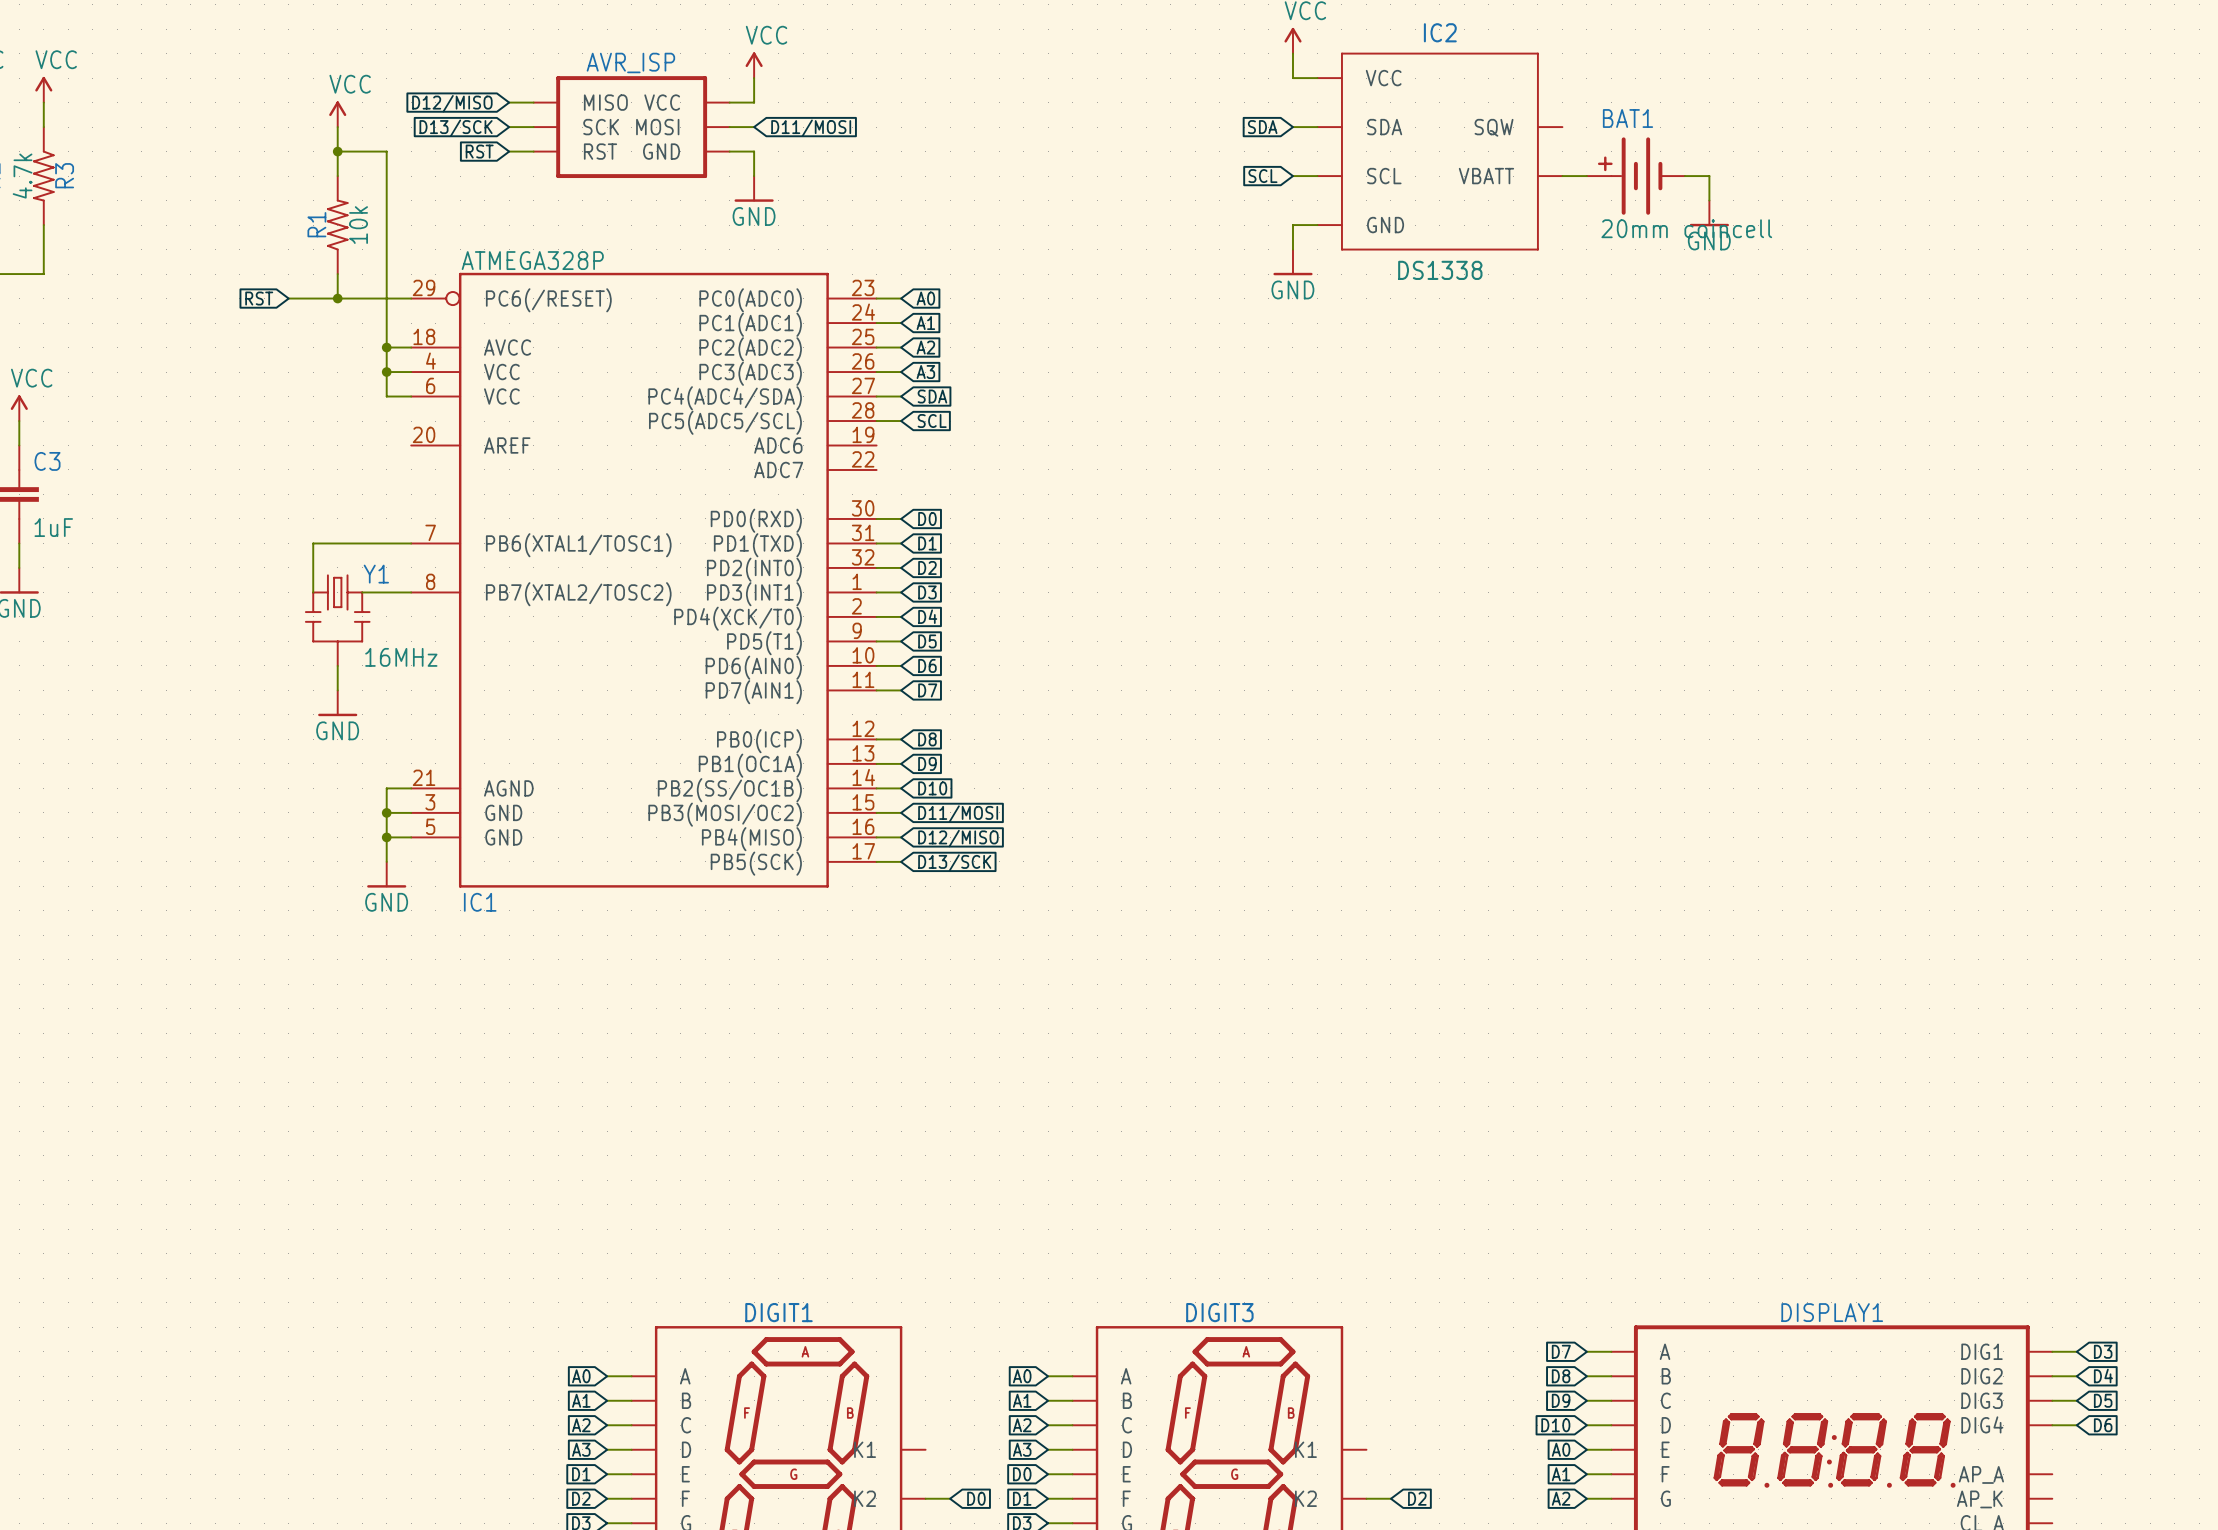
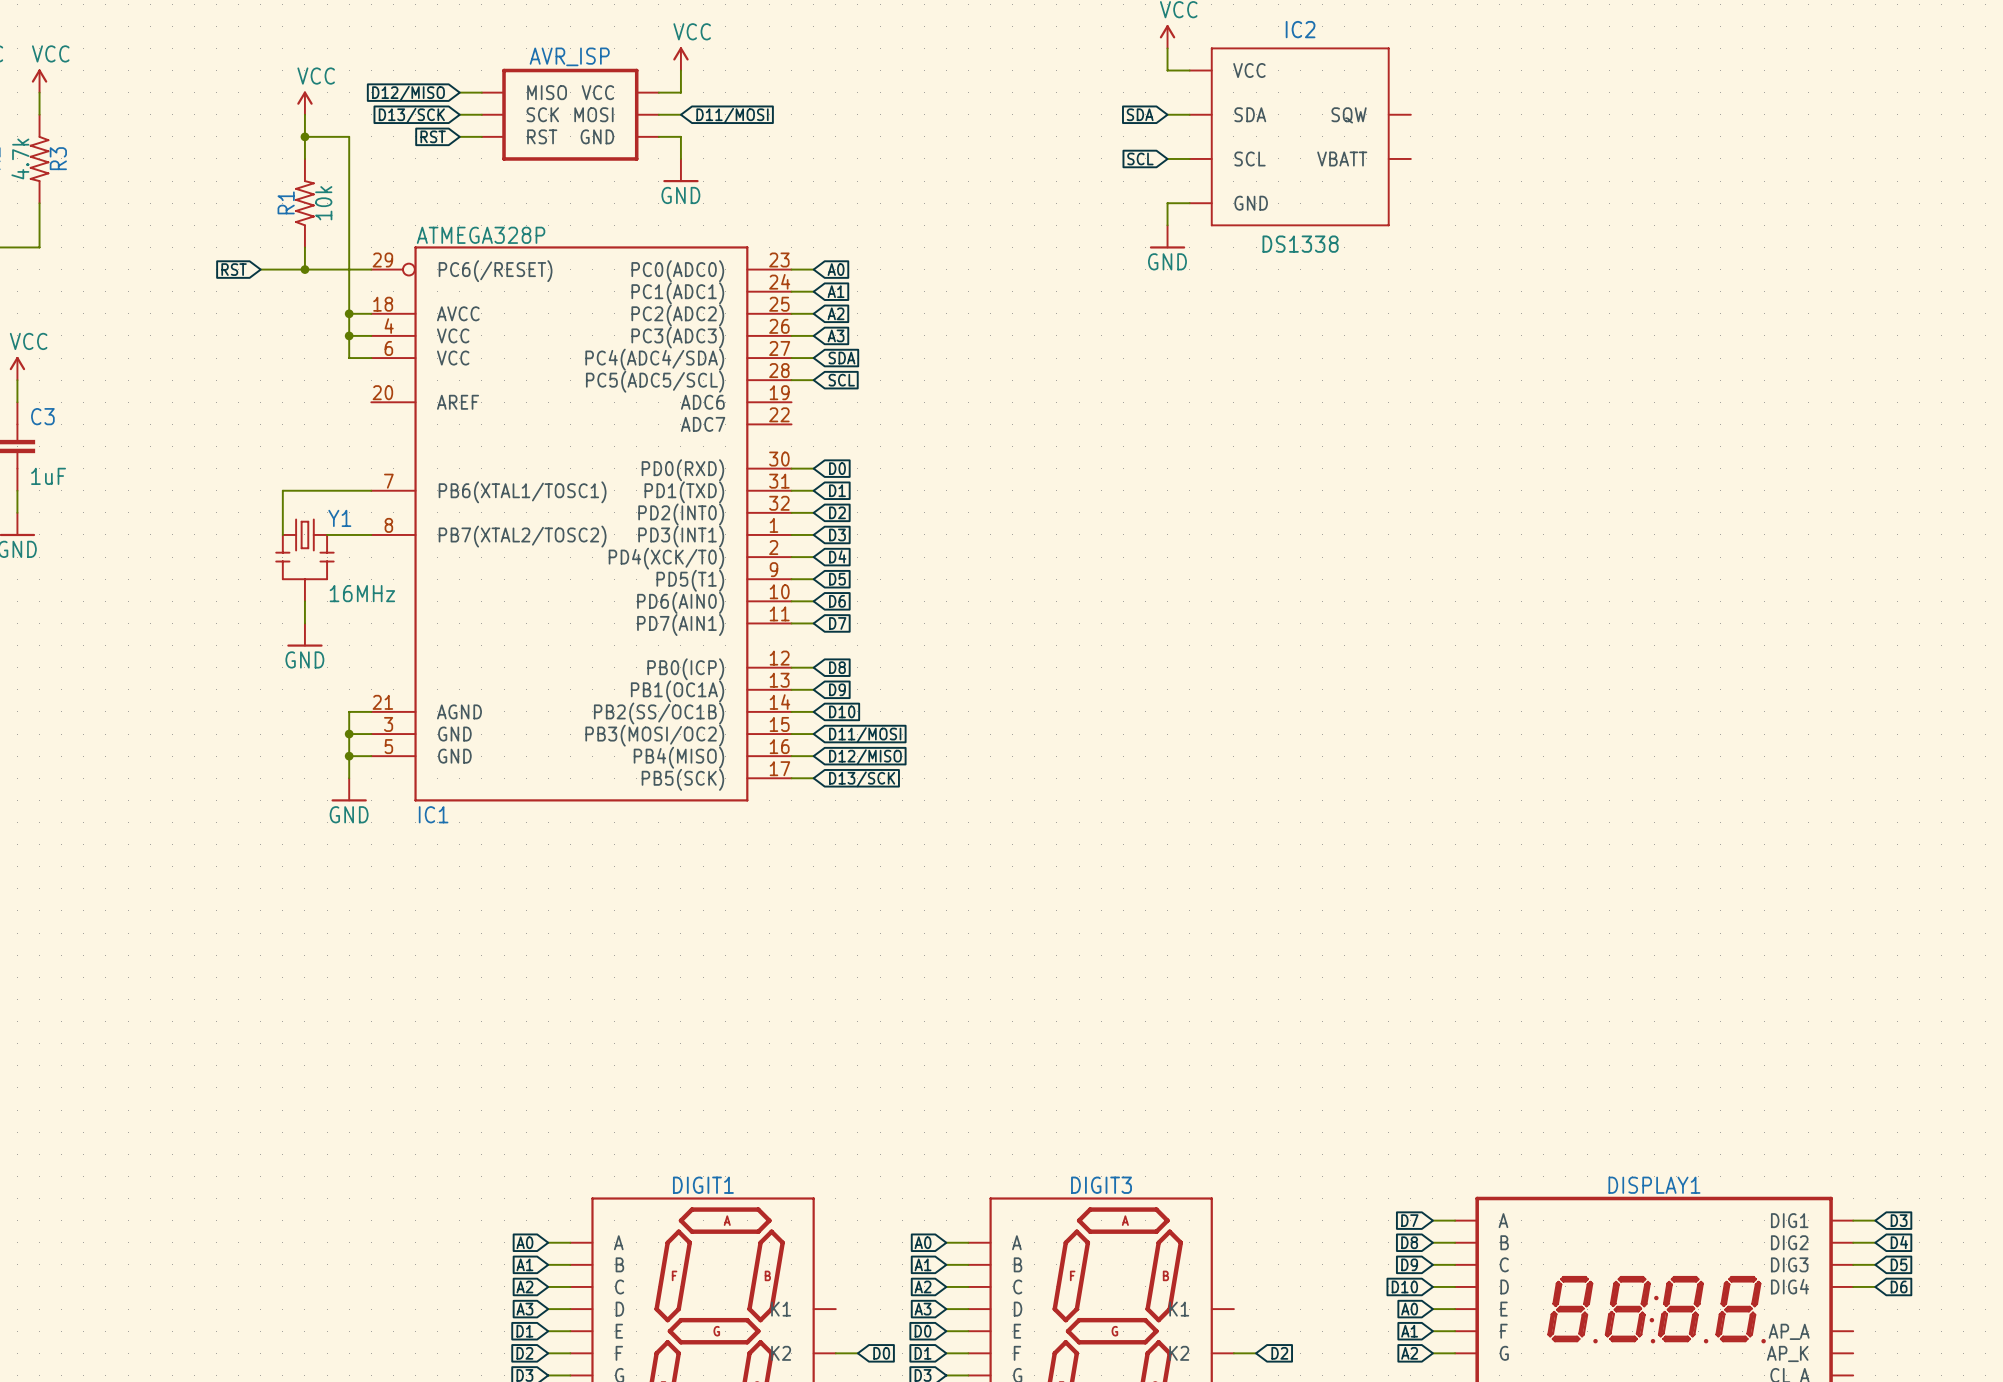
wire: (1562, 176) (1586, 176) -> none
BAT1: 20mm coincell (1635, 176) -> none
wire: (1684, 176) (1709, 176) (1709, 200) -> none
power symbol: GND (1709, 213) -> none

